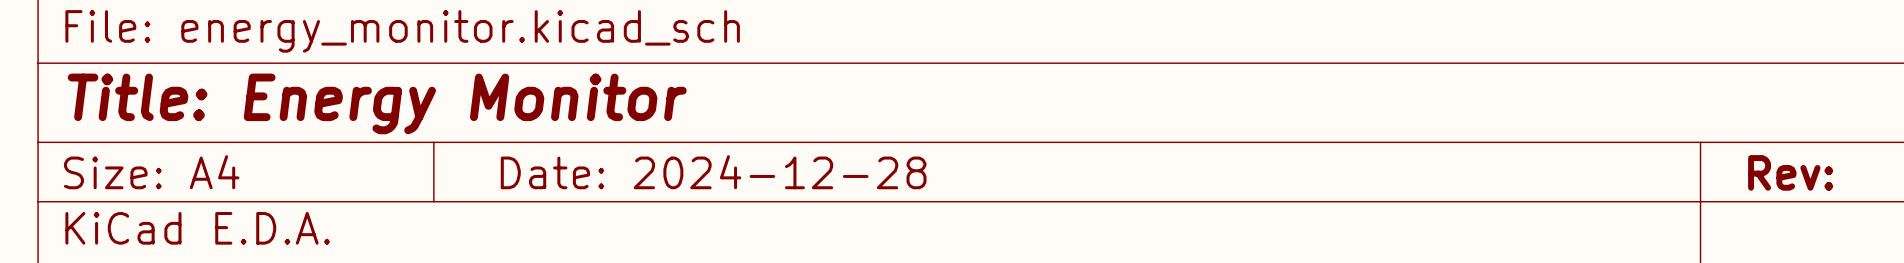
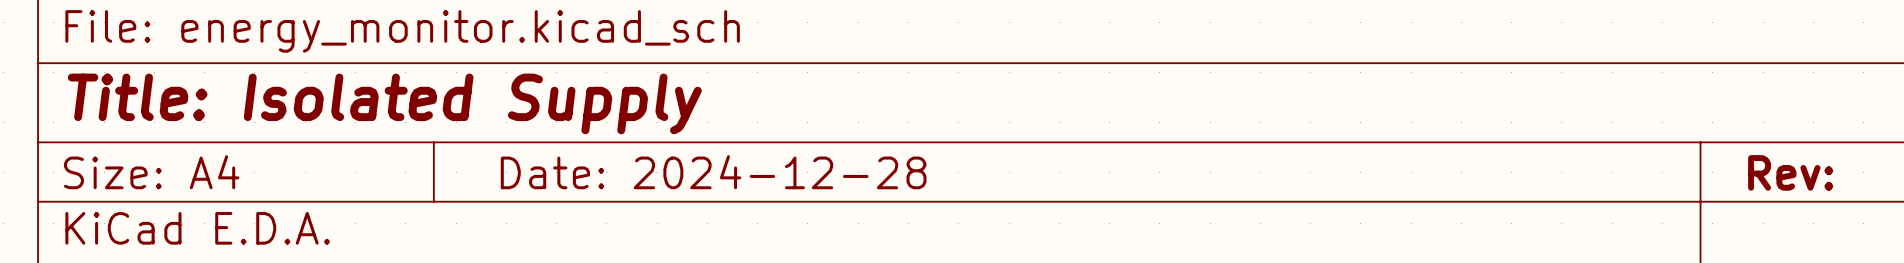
title block: Title: Energy Monitor (377, 103) -> Title: Isolated Supply (384, 103)

